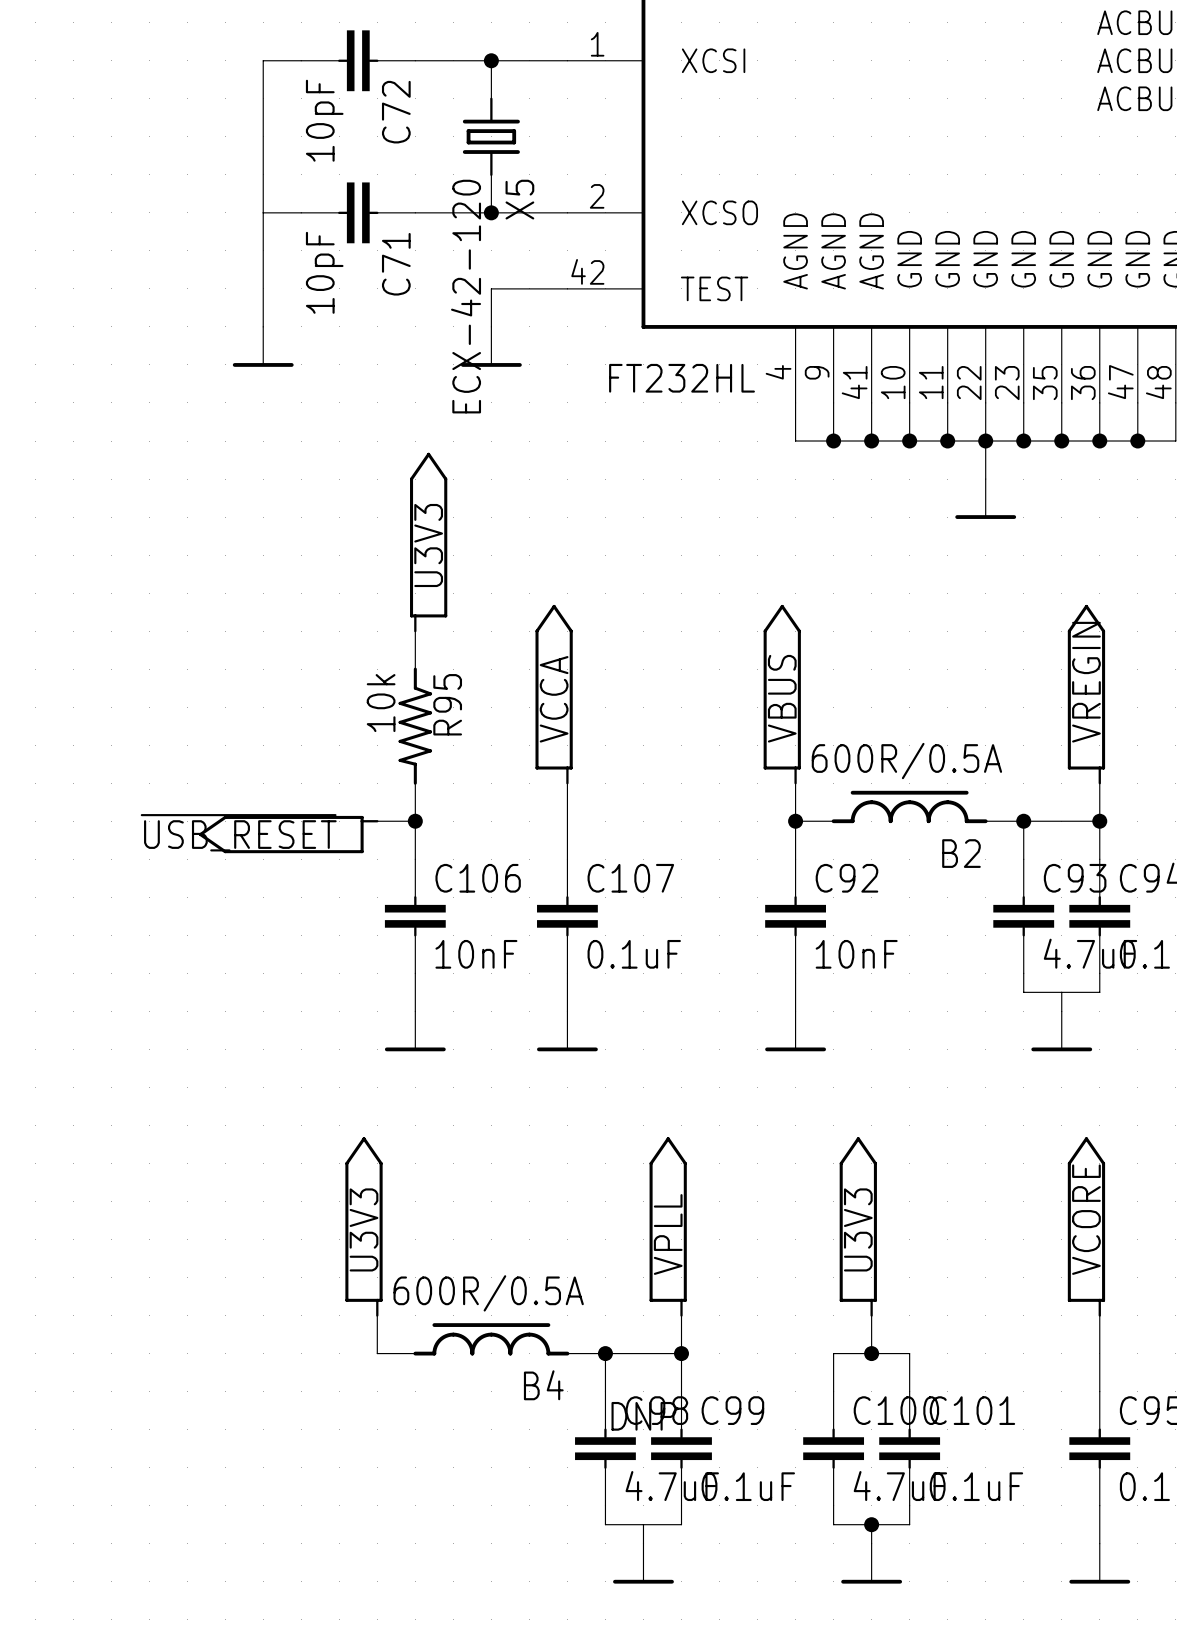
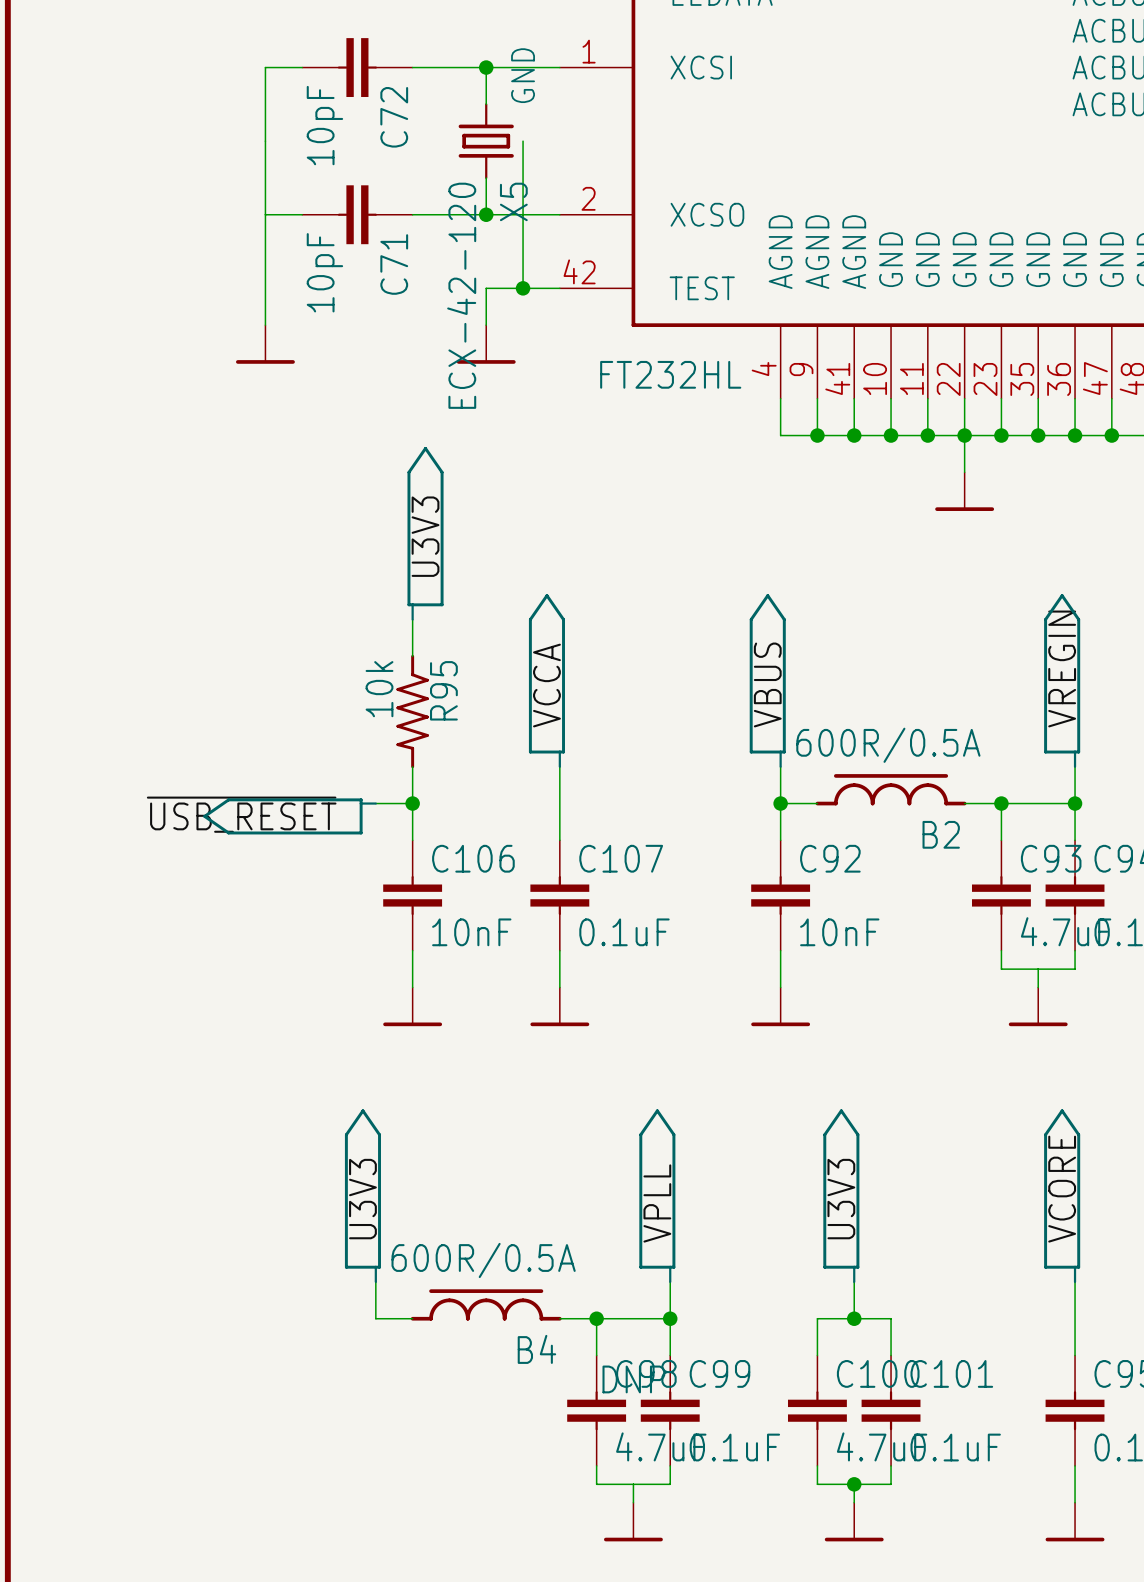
X5 pin name: none -> GND (523, 75)
wire: none -> (523, 141) (523, 288)
junction: none -> (523, 288)

